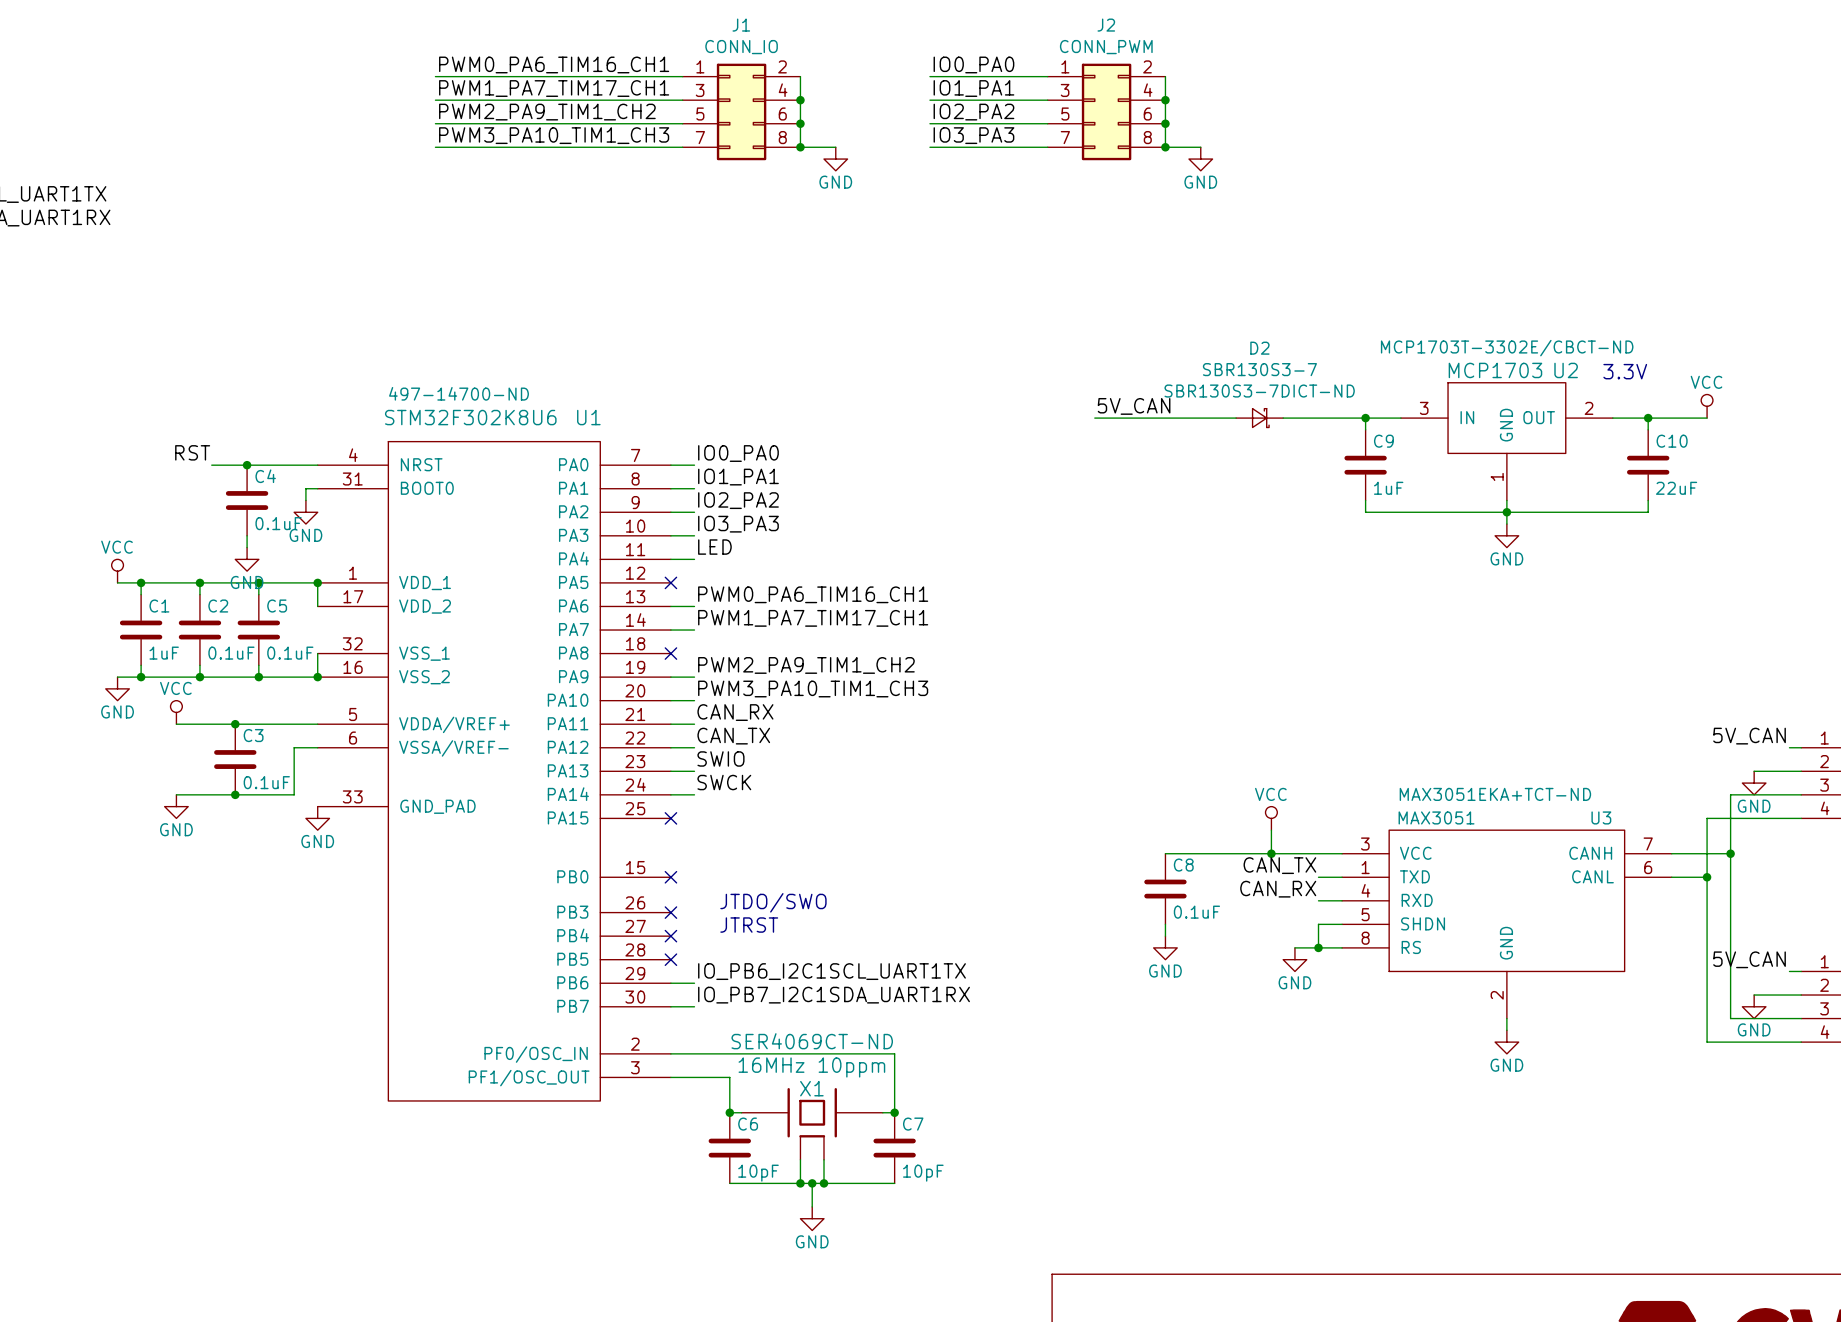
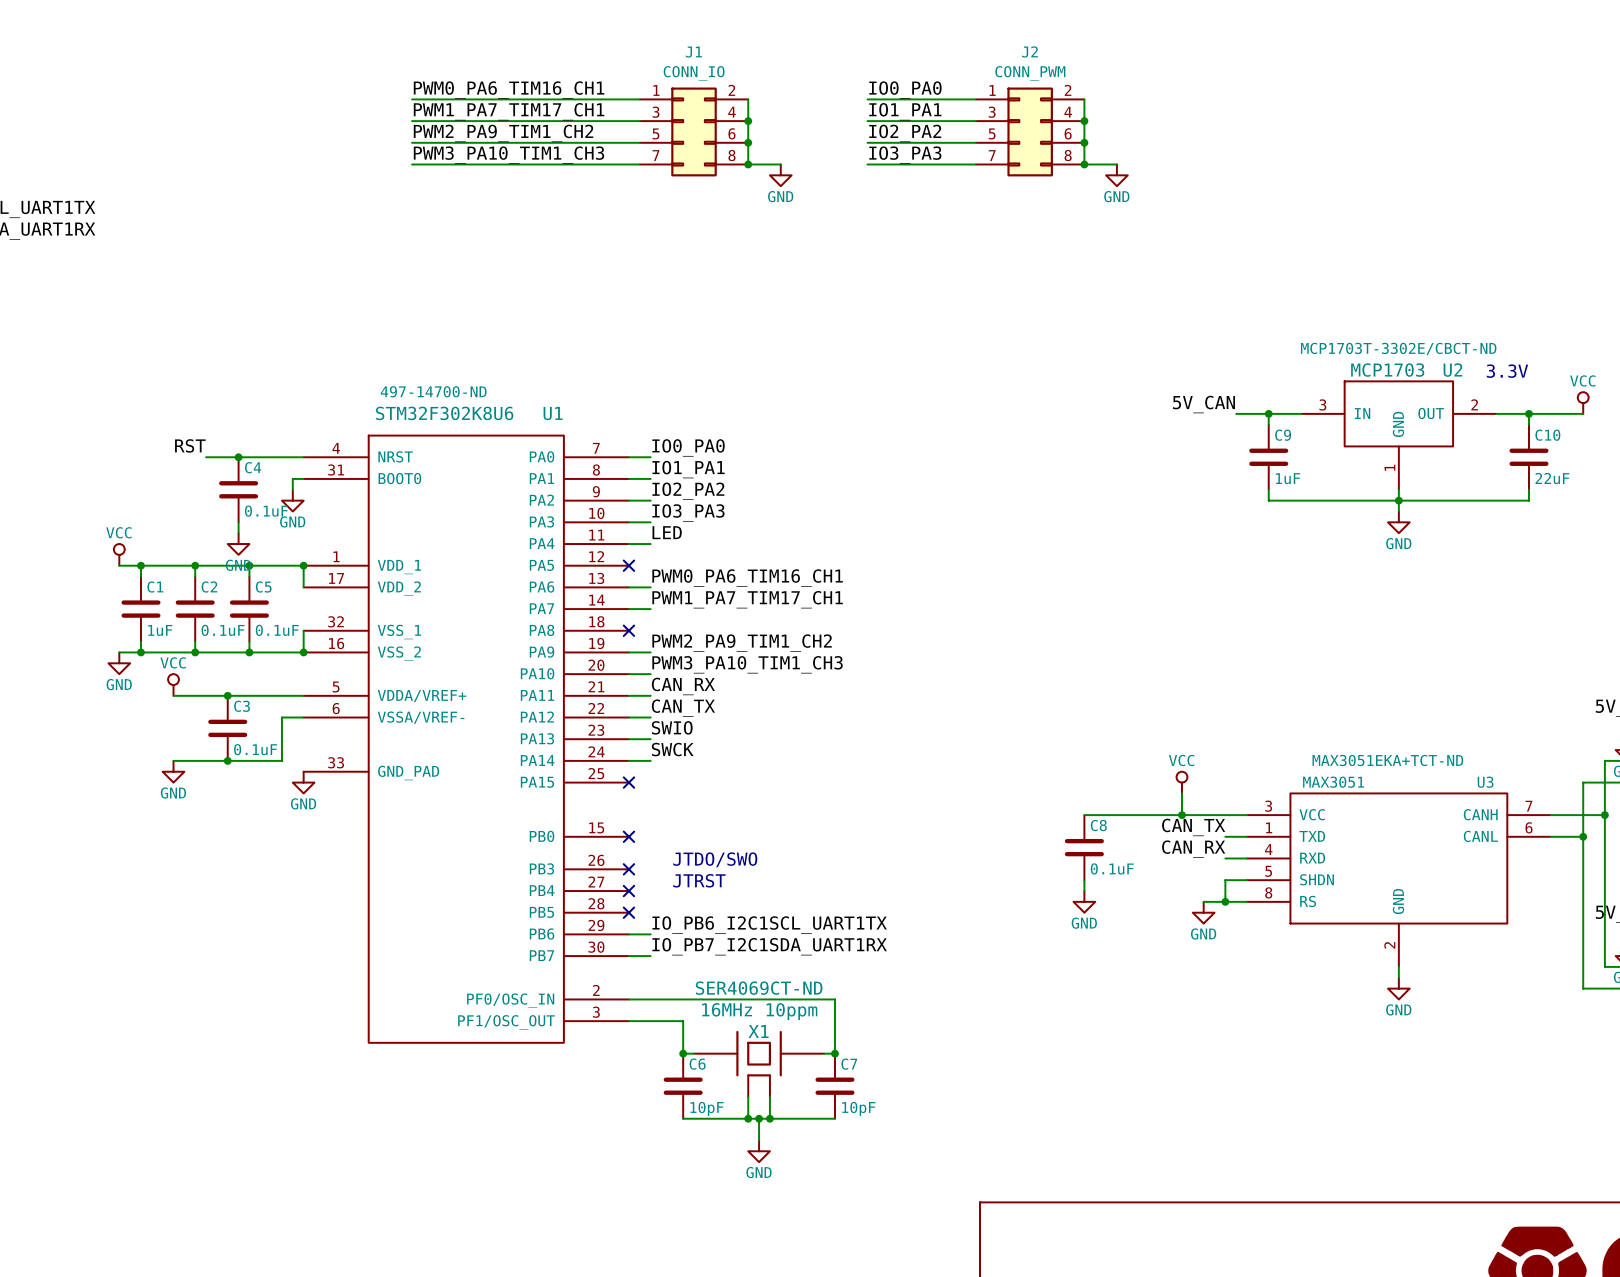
label: 5V_CAN (1134, 406) -> none
label: none -> 5V_CAN (1203, 404)
wire: (1094, 418) (1236, 418) -> none
D2: SBR130S3-7 (1259, 418) -> none
wire: (1283, 418) (1330, 418) -> none

